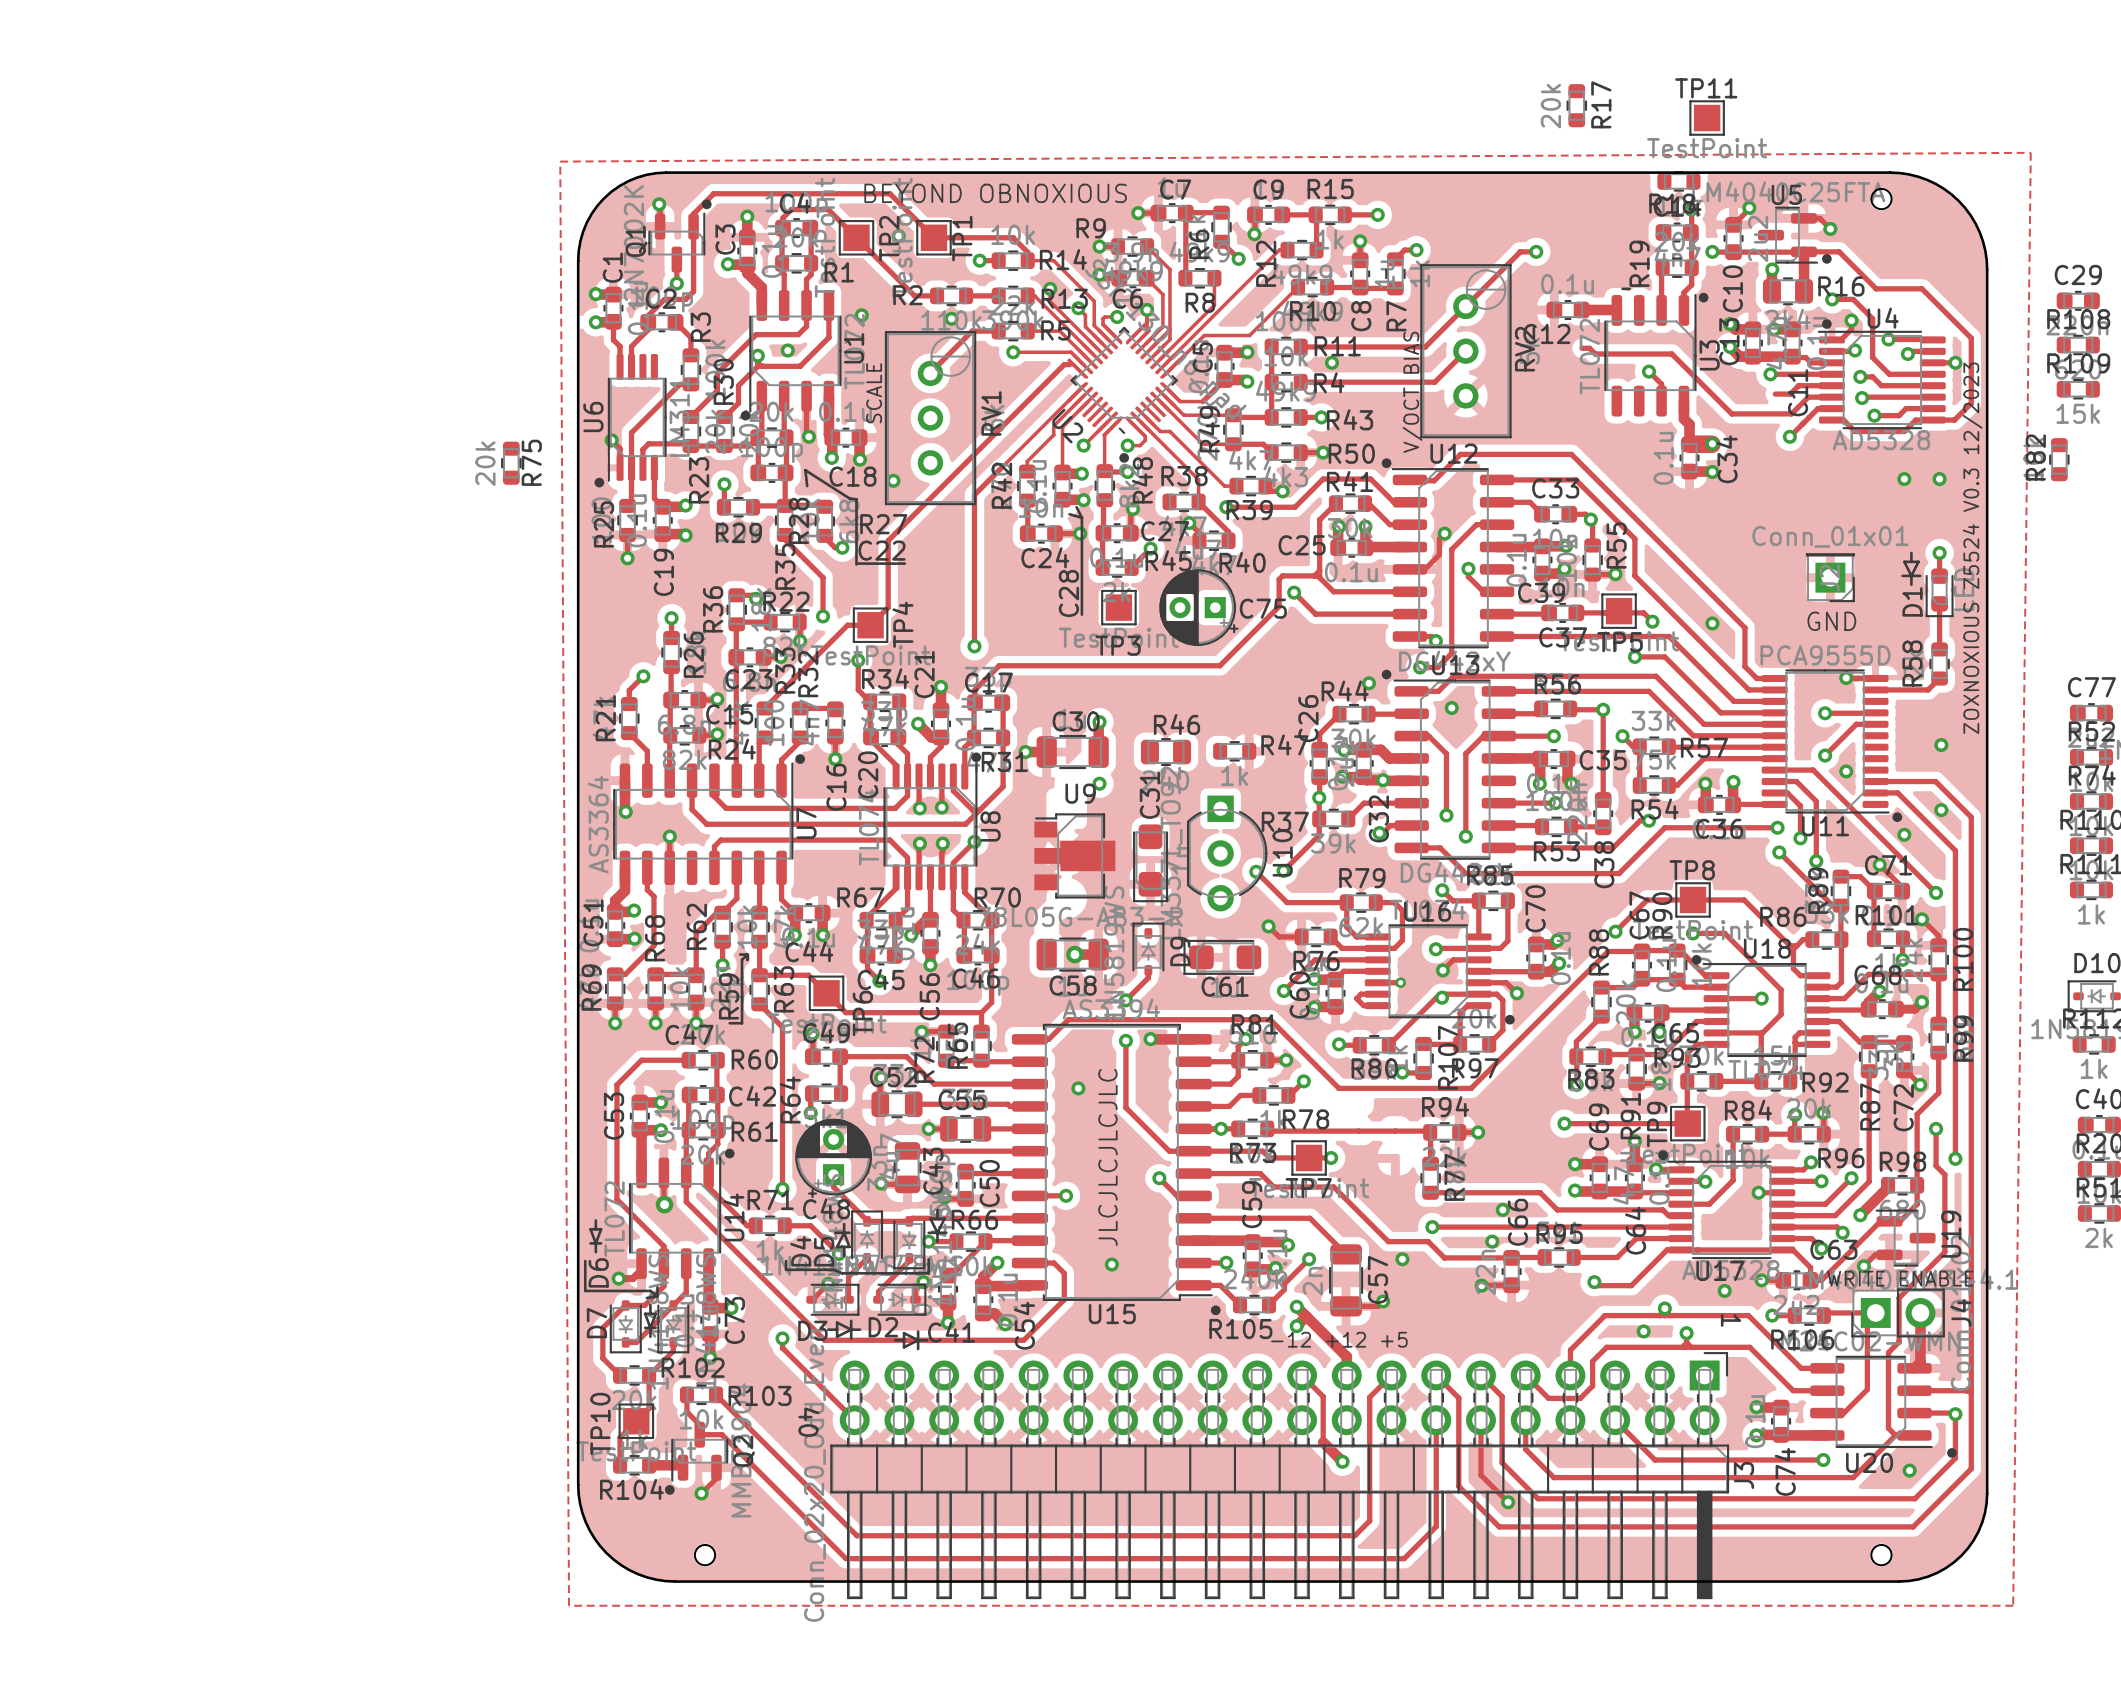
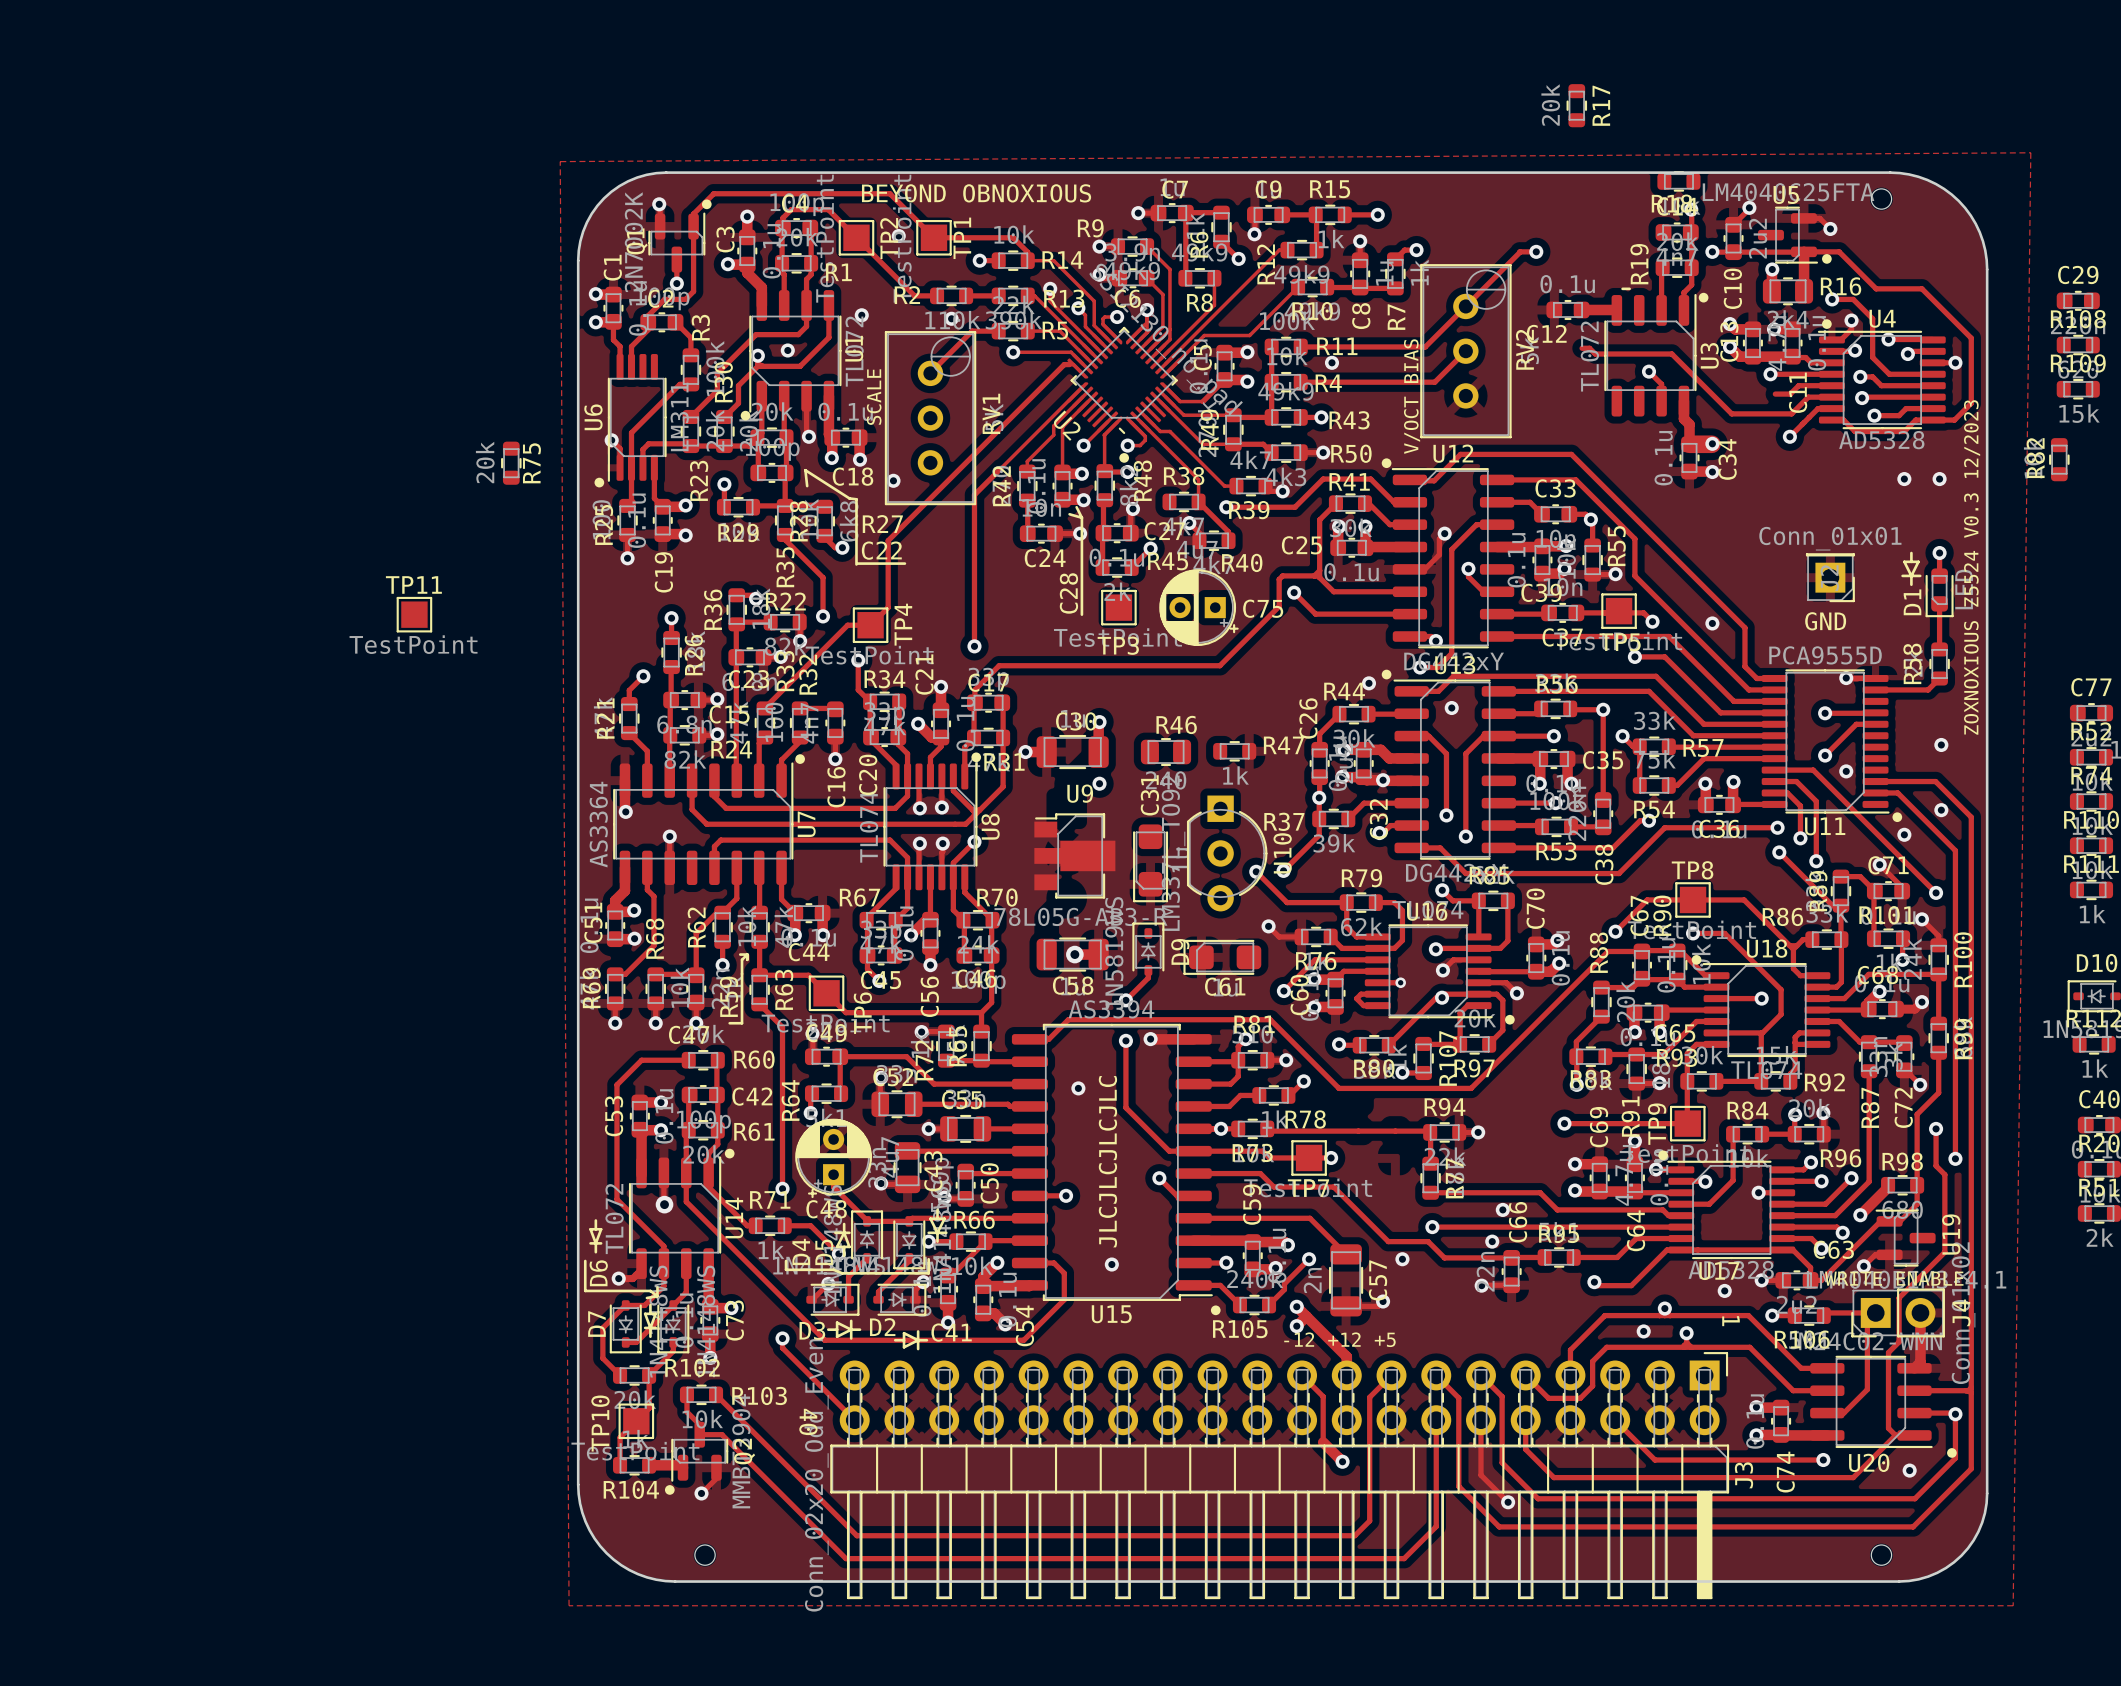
TP11 position: (1707, 118) -> (414, 614)

